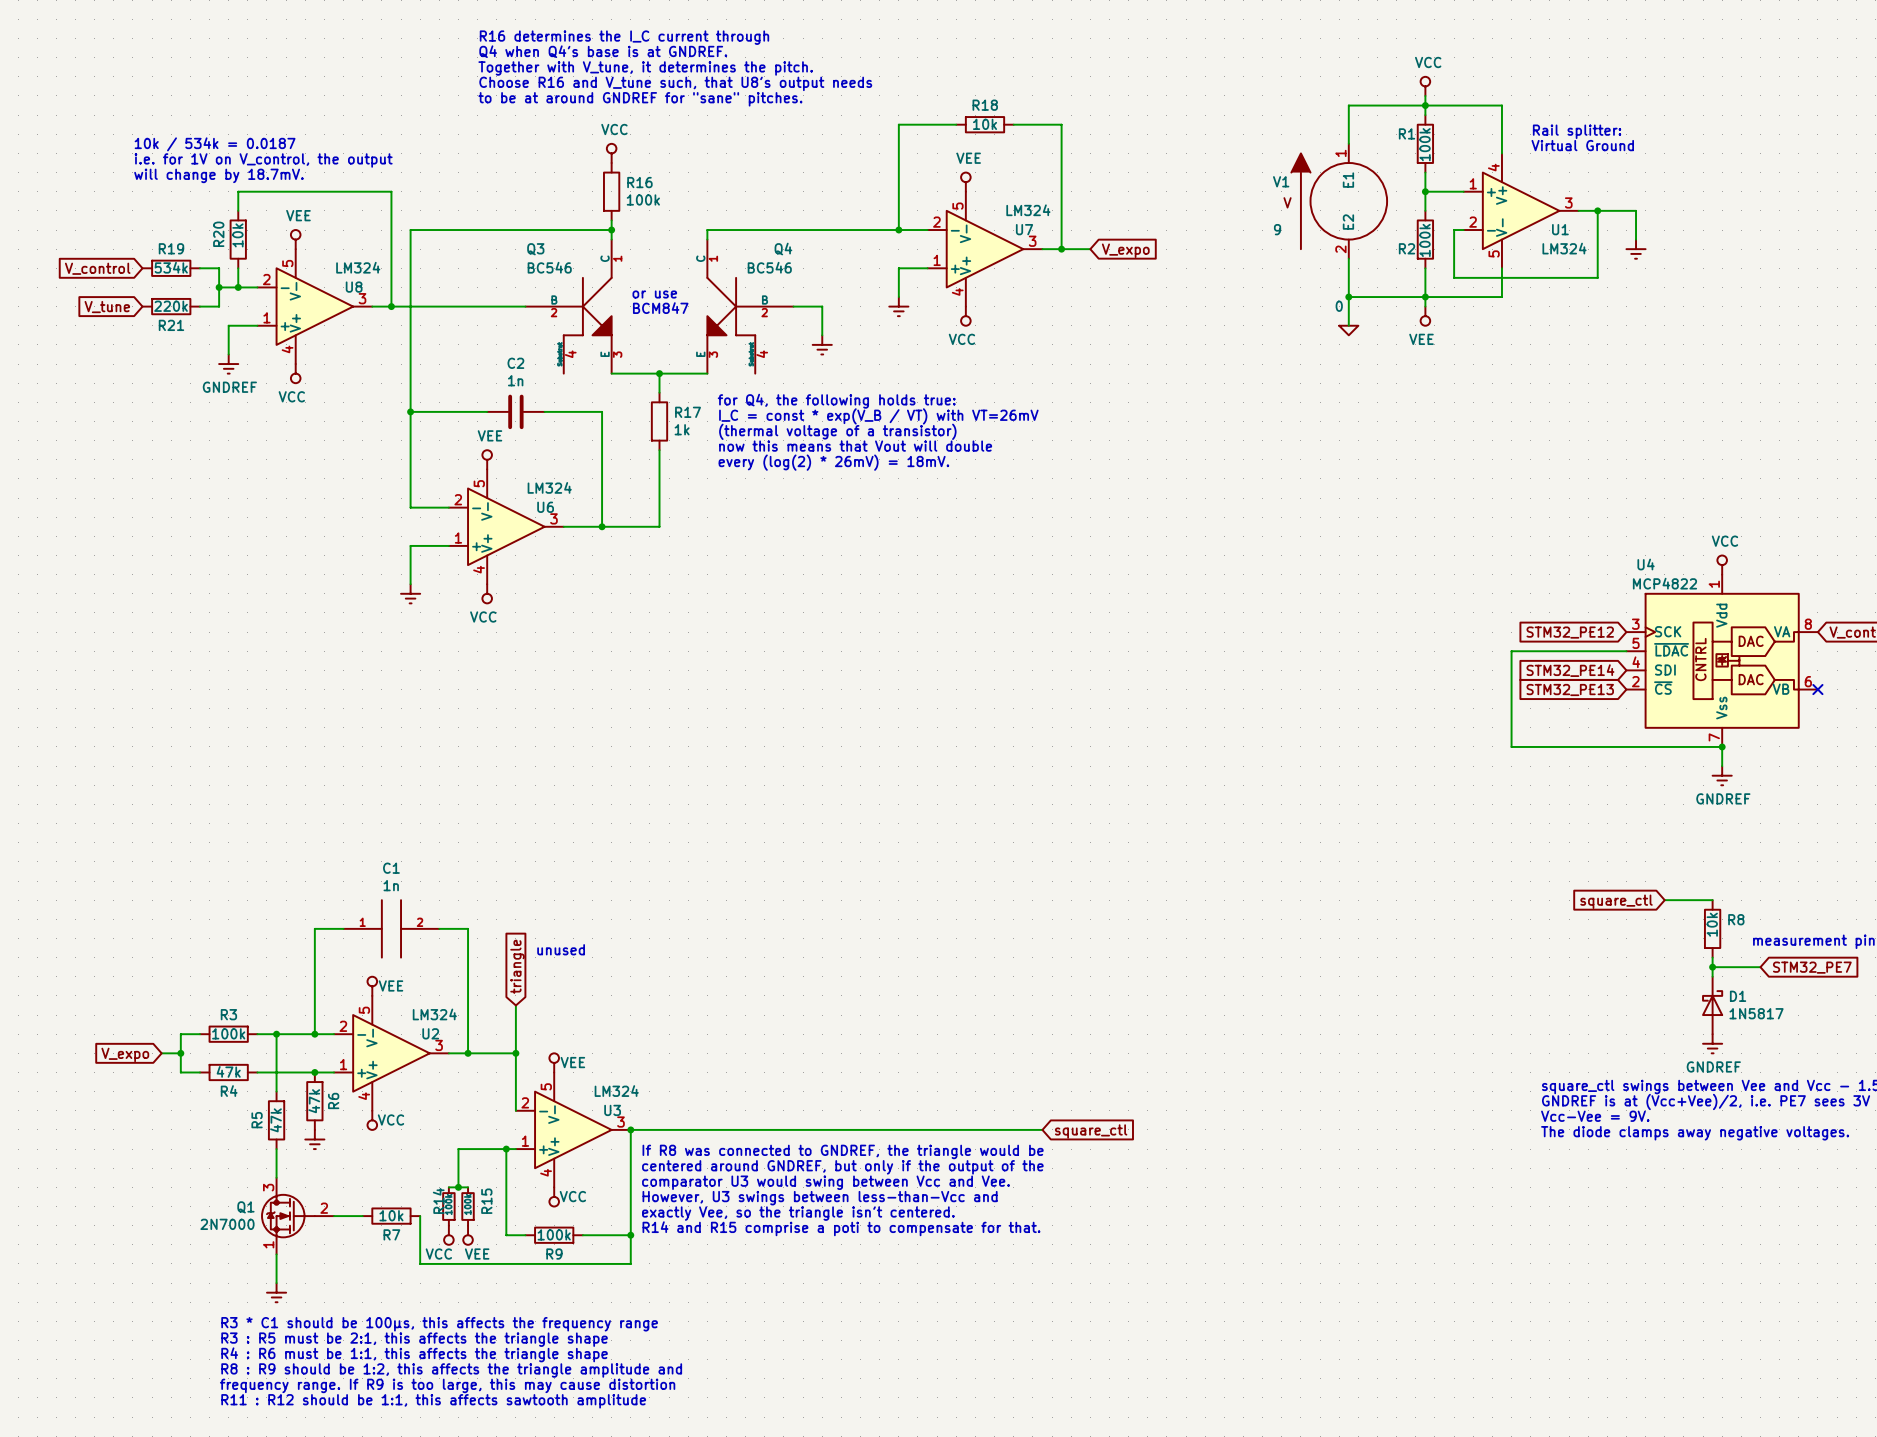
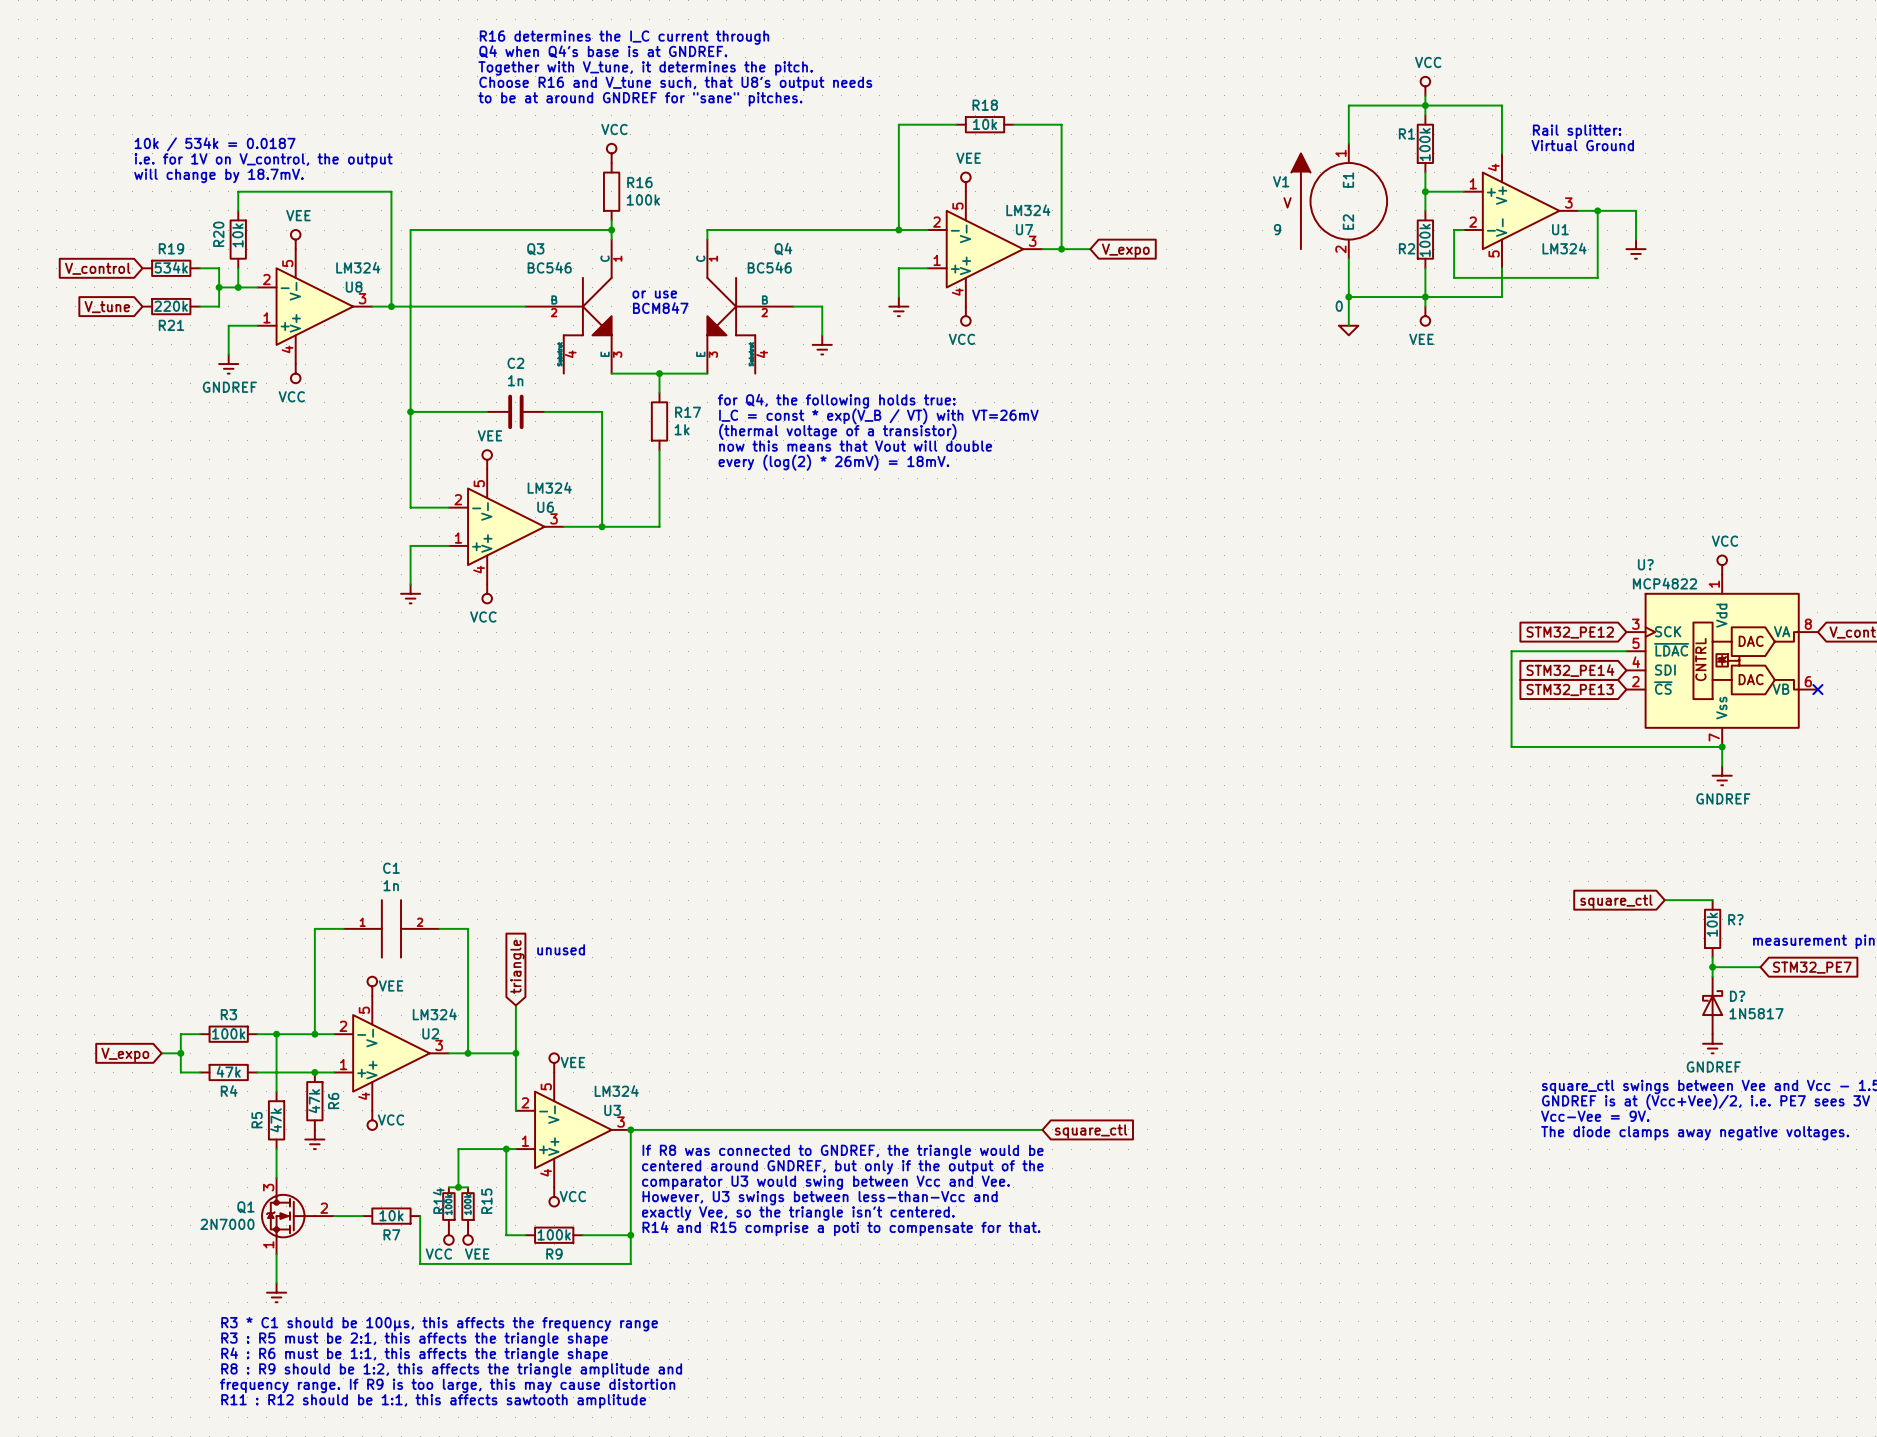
U4 name: U4 (1646, 564) -> U? (1645, 564)
R8 name: R8 (1736, 919) -> R? (1735, 919)
D1 name: D1 (1738, 996) -> D? (1737, 996)

